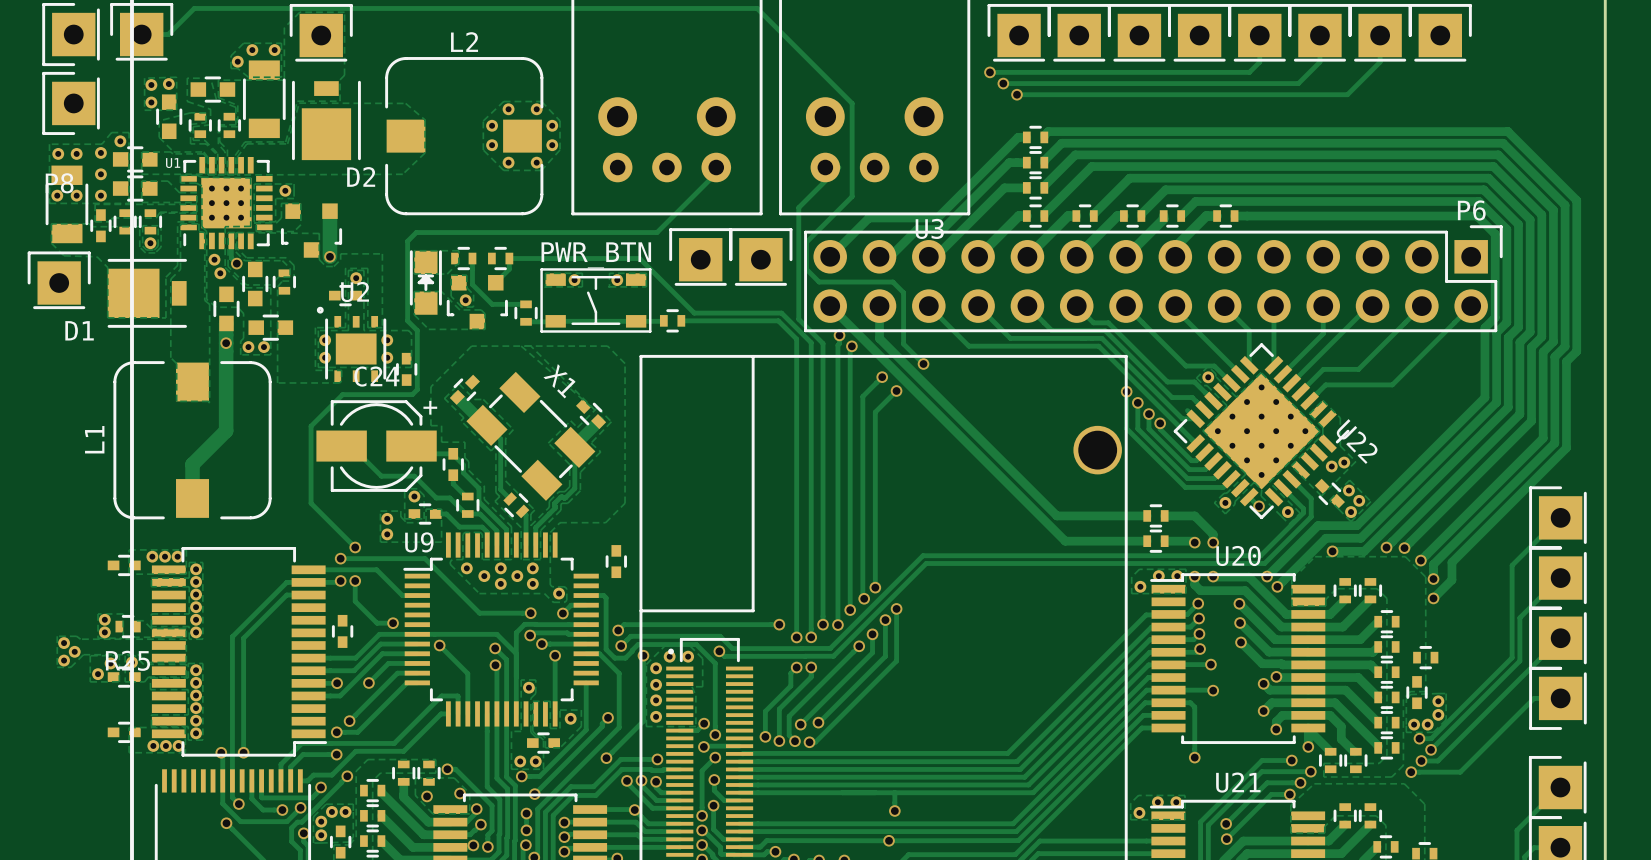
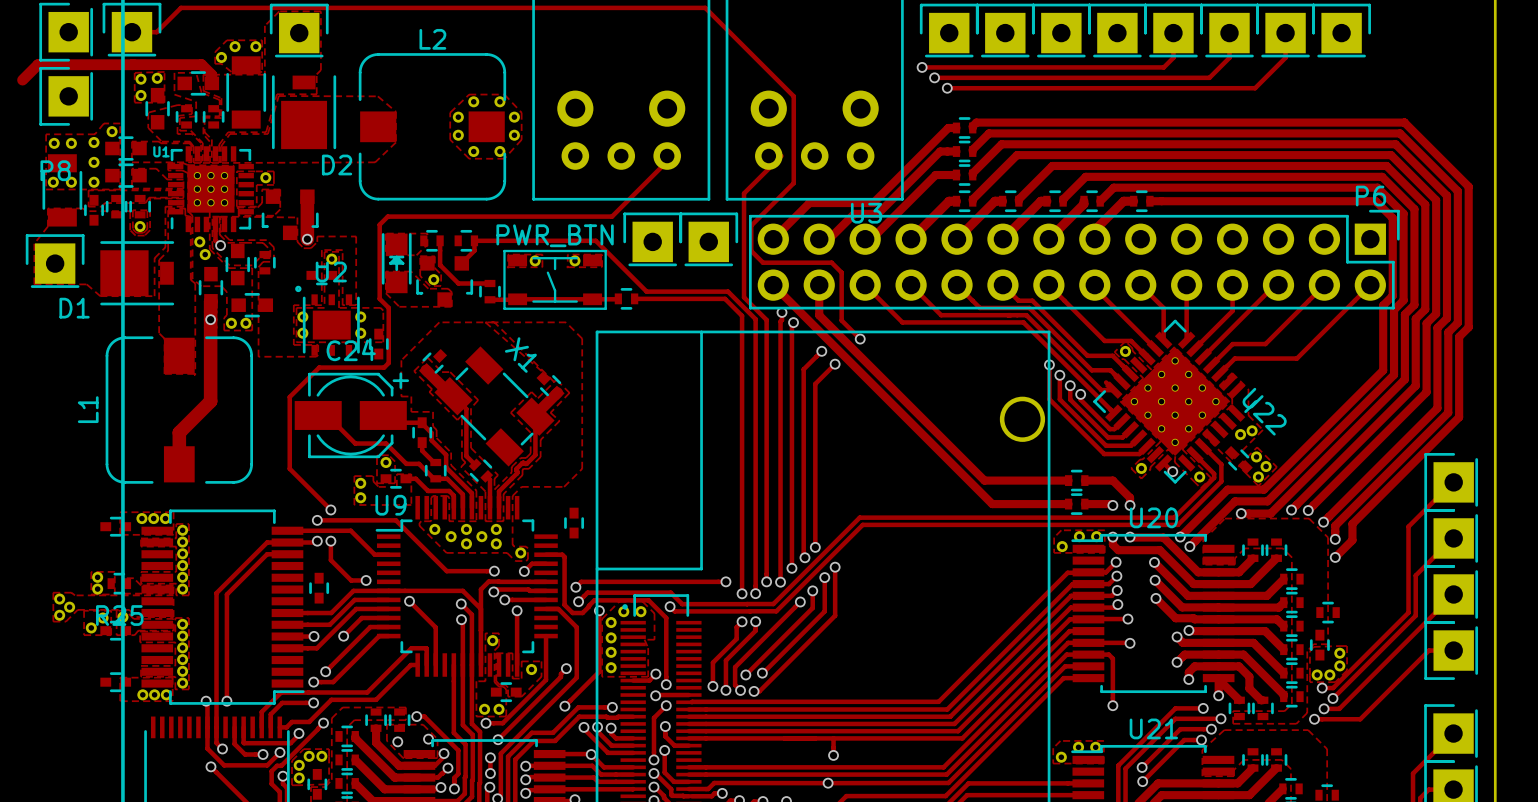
track: none -> (132, 64) (201, 64) (211, 74) (211, 83)
track: none -> (132, 64) (37, 64) (22, 80)
zone outline: (51, 243) (64, 255) (97, 256) (107, 267) (107, 317) -> (47, 226) (34, 243) (34, 284) (86, 284) (100, 296)

